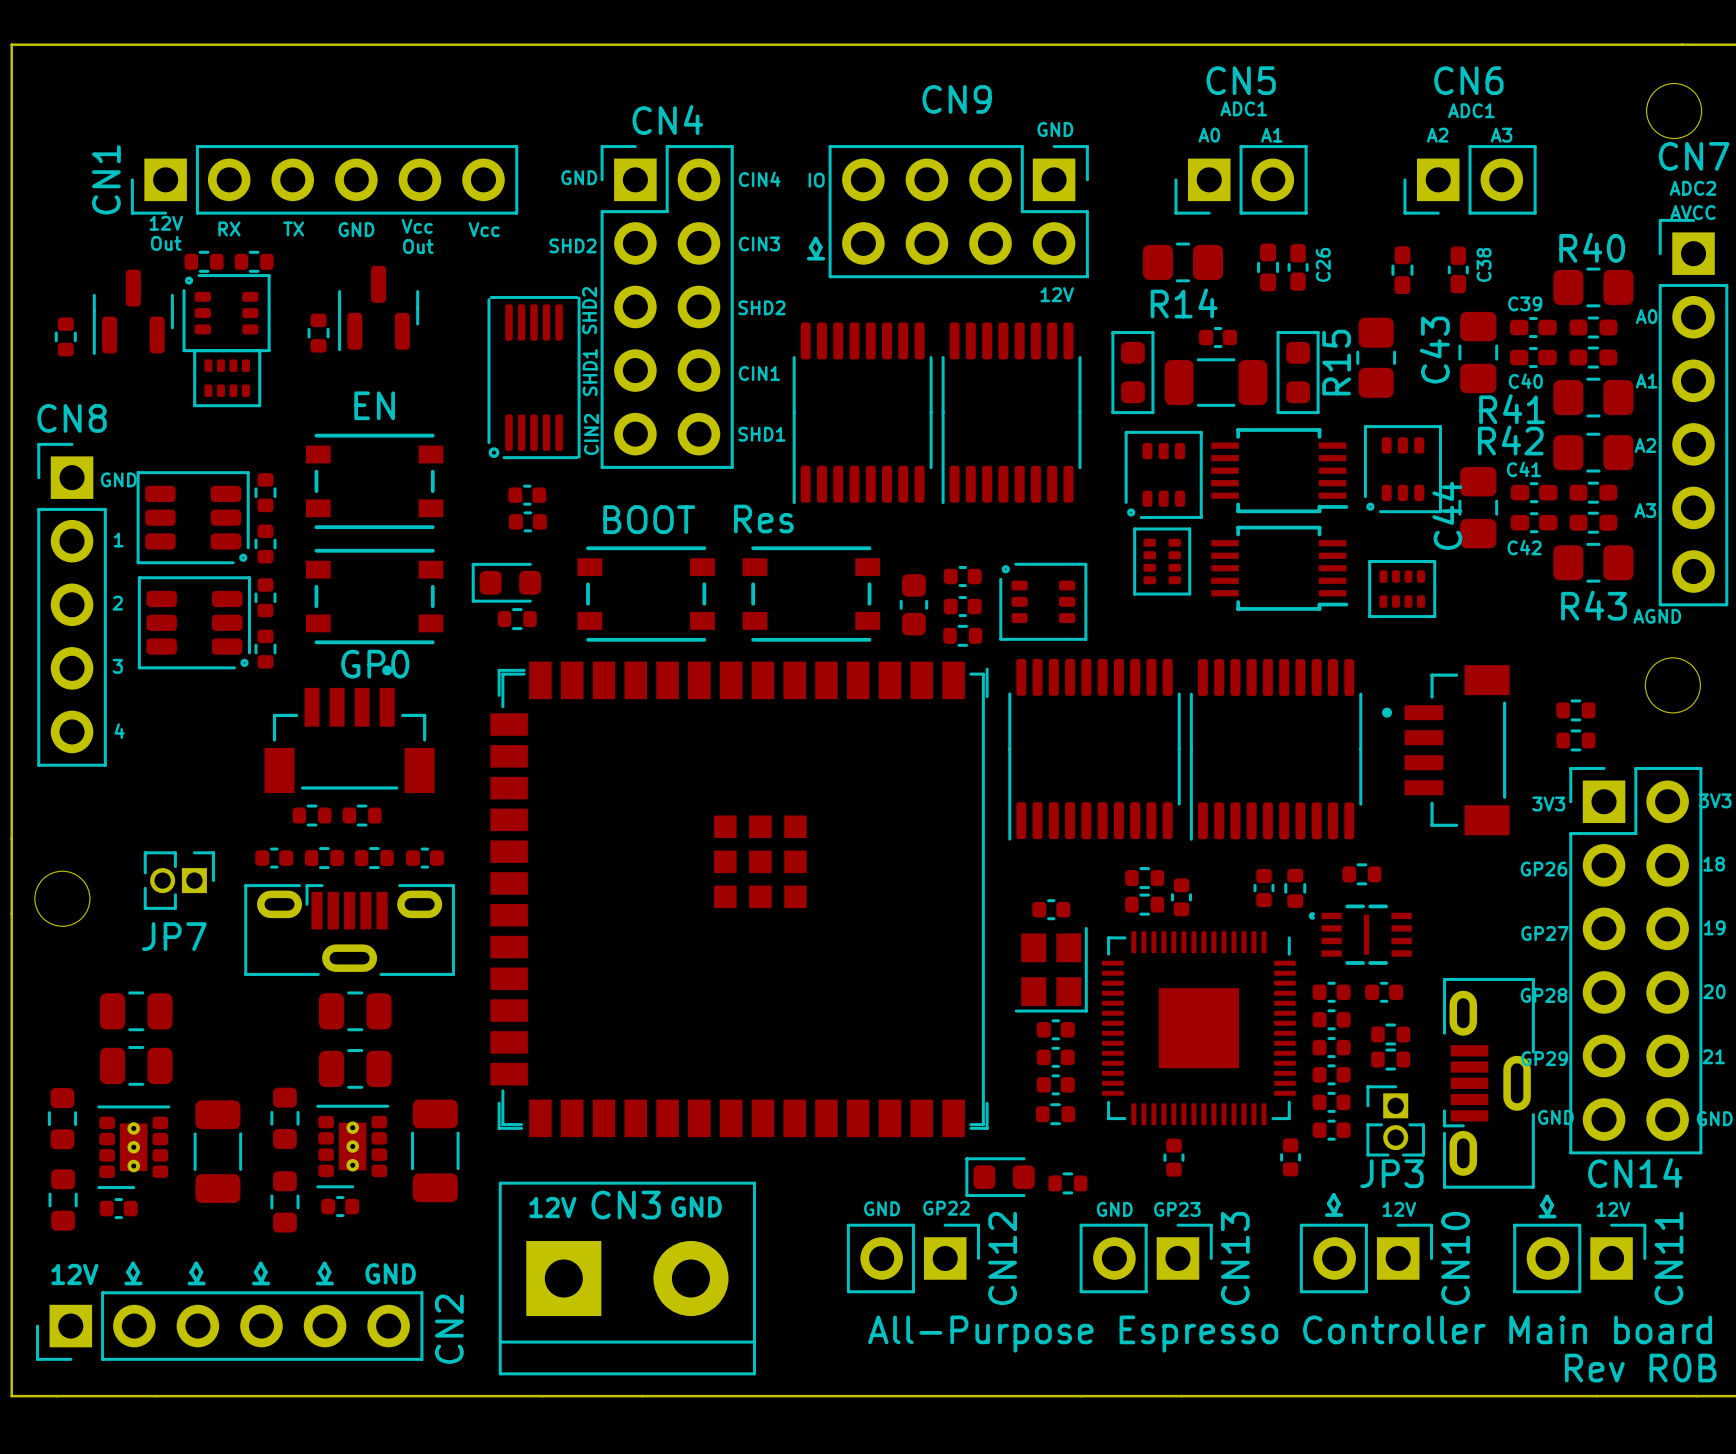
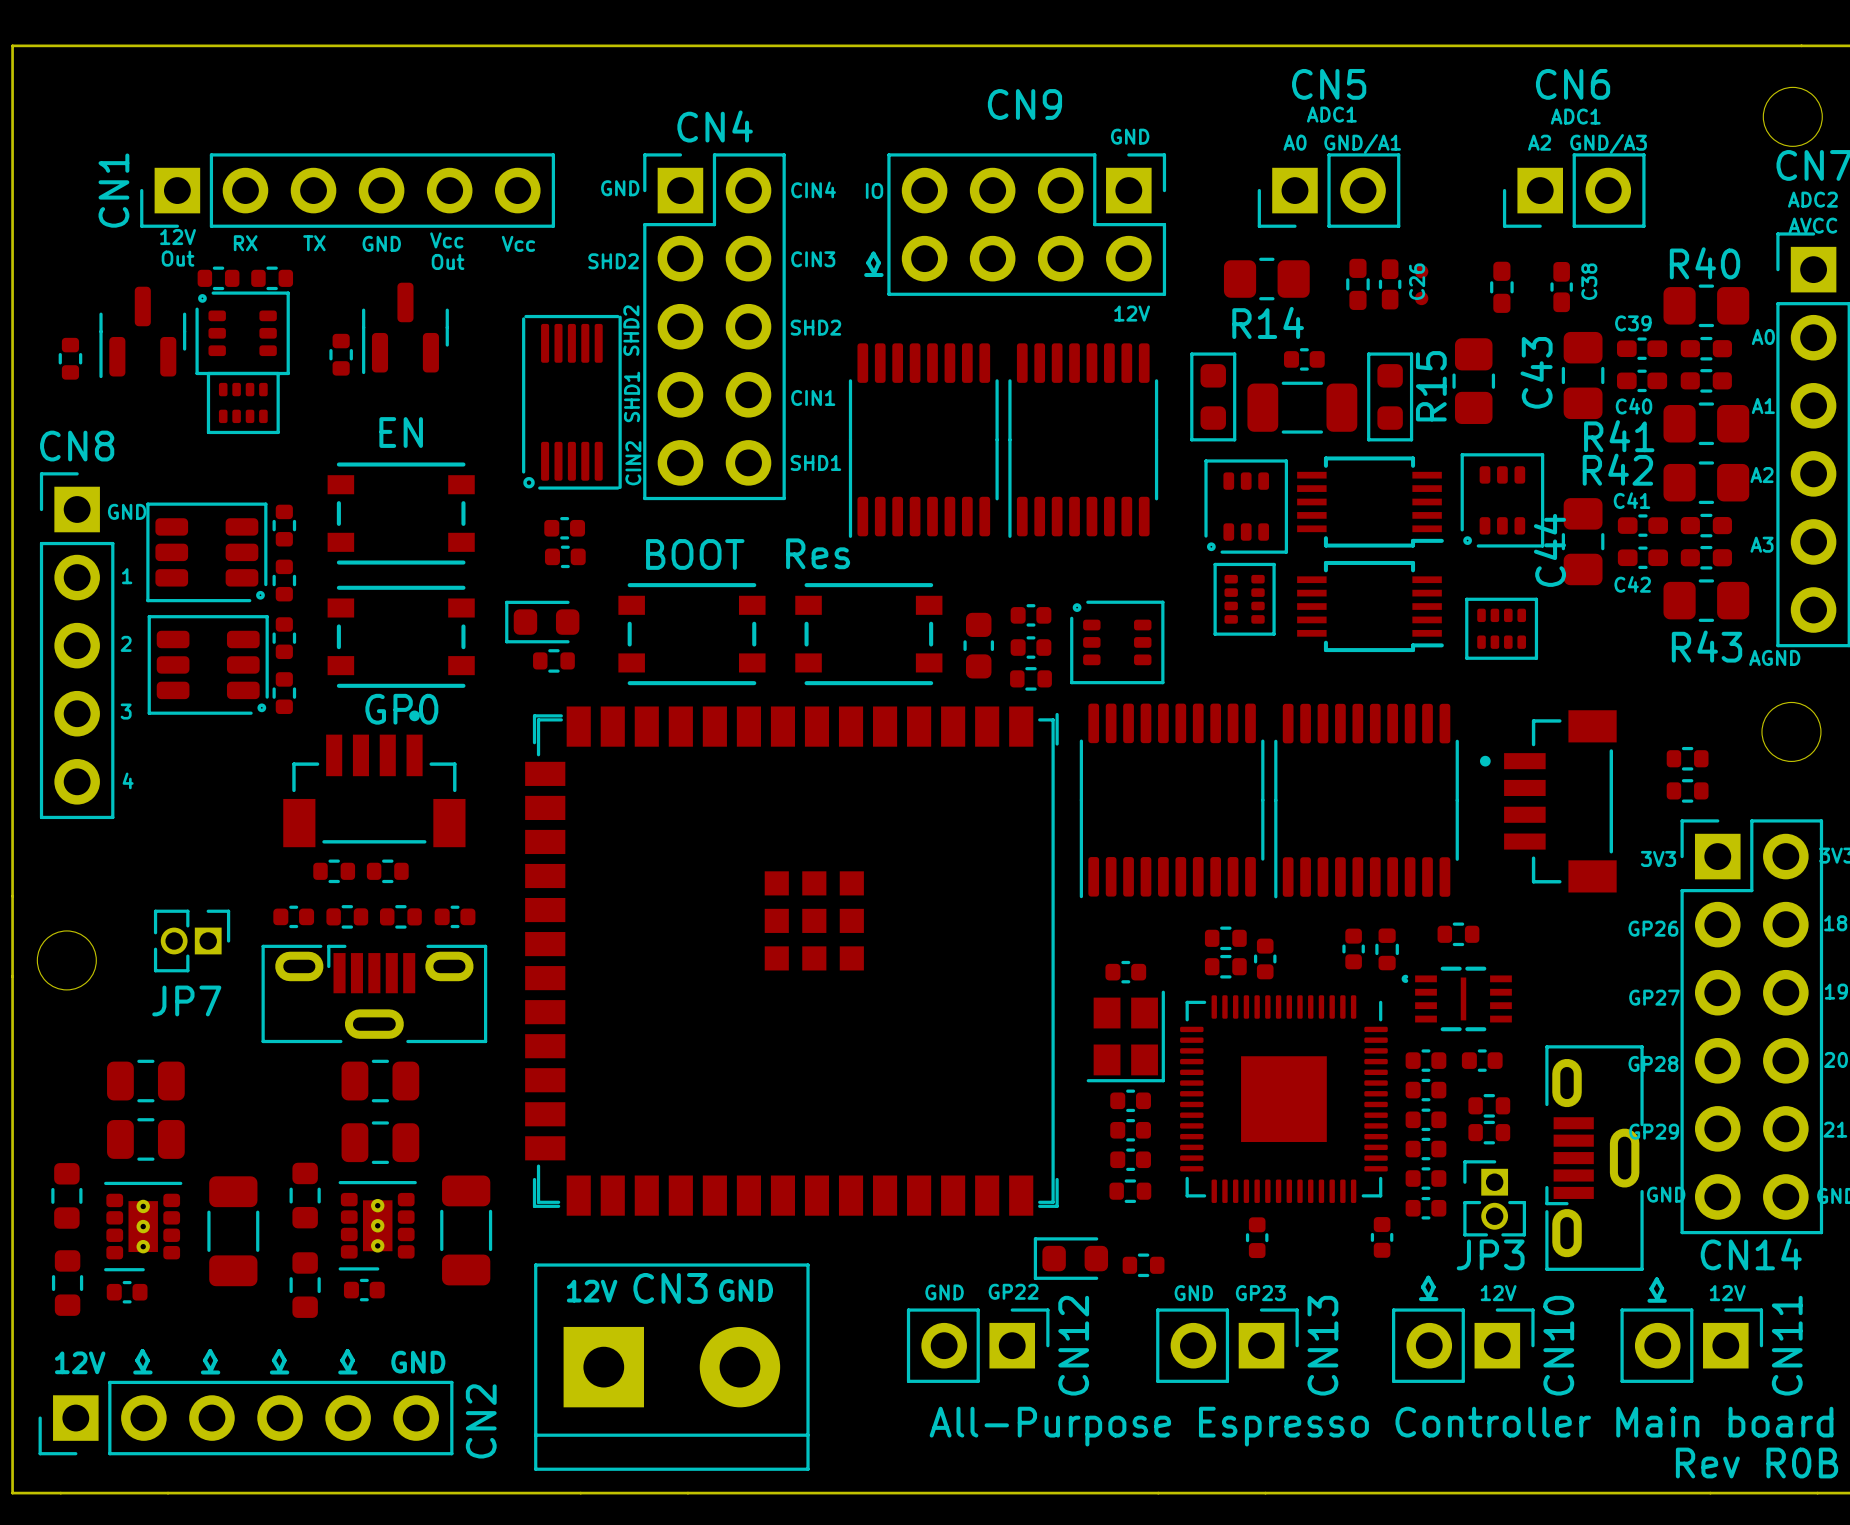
text: A1 (1271, 135) -> GND/A1 (1362, 143)
text: A3 (1501, 135) -> GND/A3 (1608, 143)
part: none -> (1421, 285)

